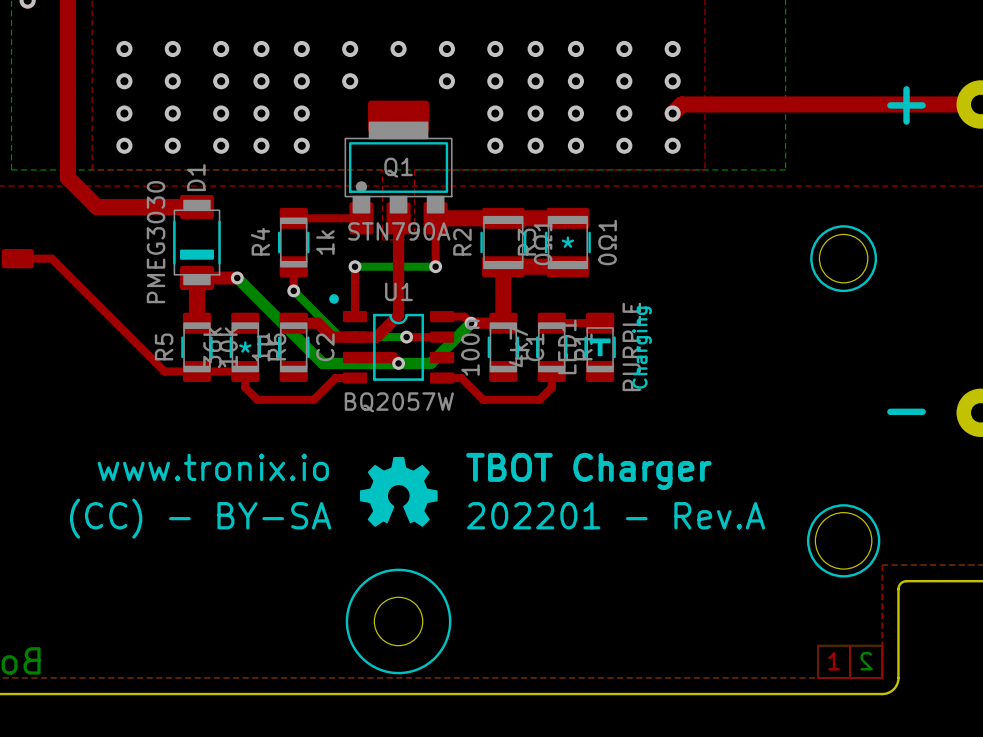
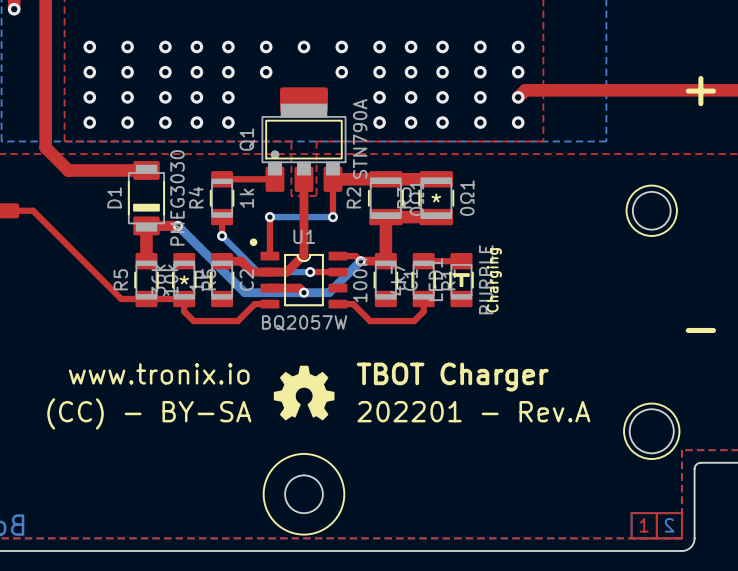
Q1 name rotation: 0° (398, 167) -> 90° counterclockwise (247, 139)
Q1 name position: Q1 (398, 167) -> Q1 (247, 139)
D1 name position: D1 (196, 177) -> D1 (114, 197)
Q1 value rotation: 0° (399, 231) -> 90° counterclockwise (360, 138)
D1 value position: PMEG3030 (156, 242) -> PMEG3030 (177, 197)

